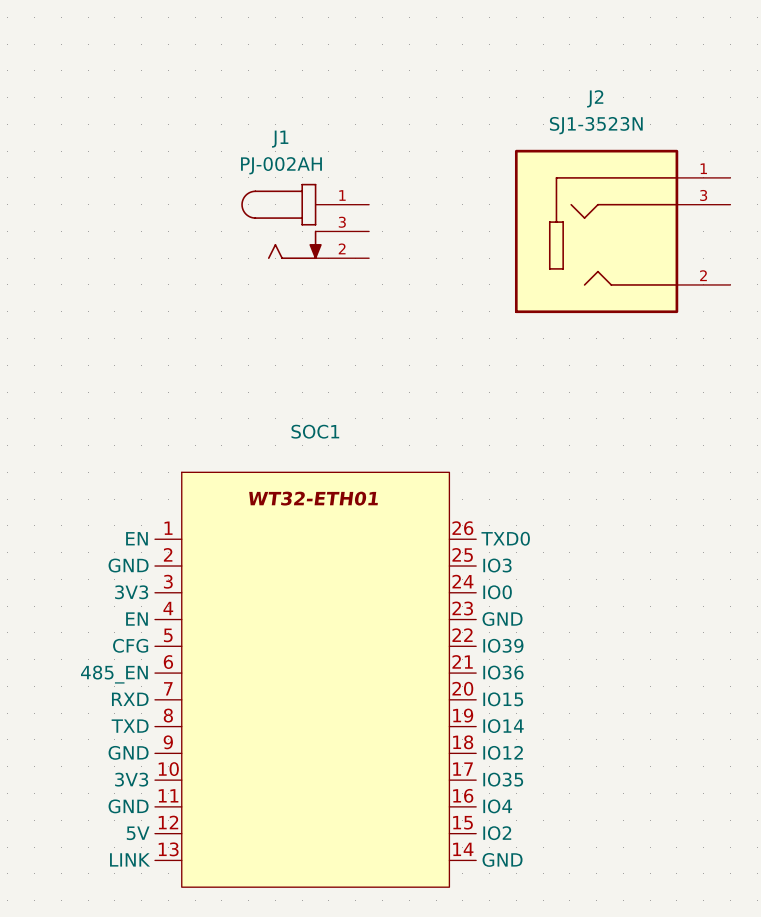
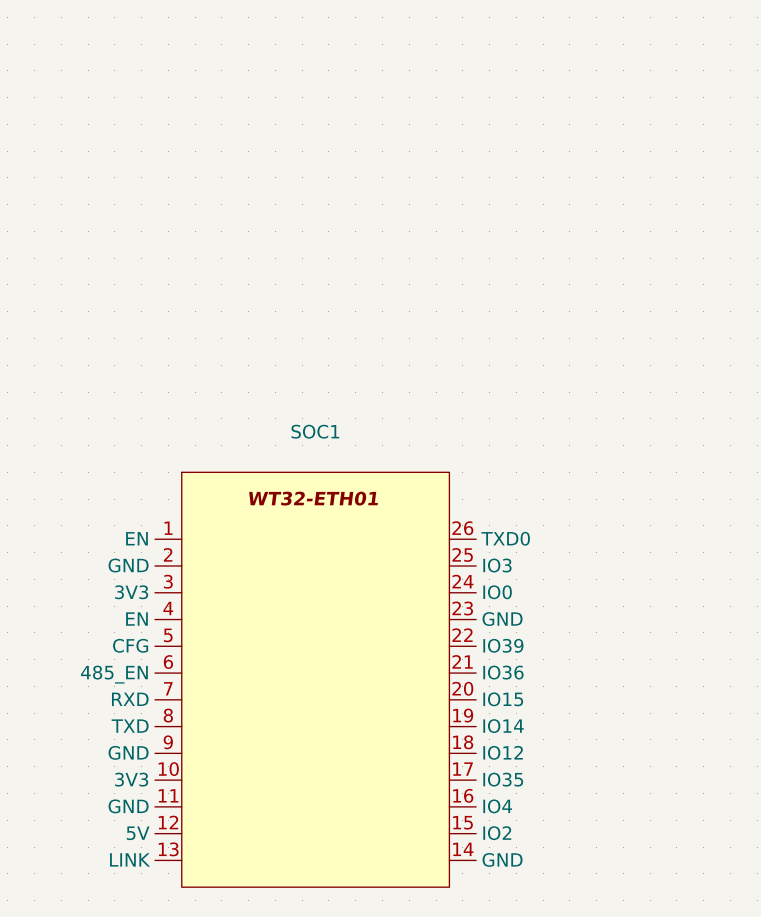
J1: PJ-002AH (305, 221) -> none
J2: SJ1-3523N (622, 231) -> none

